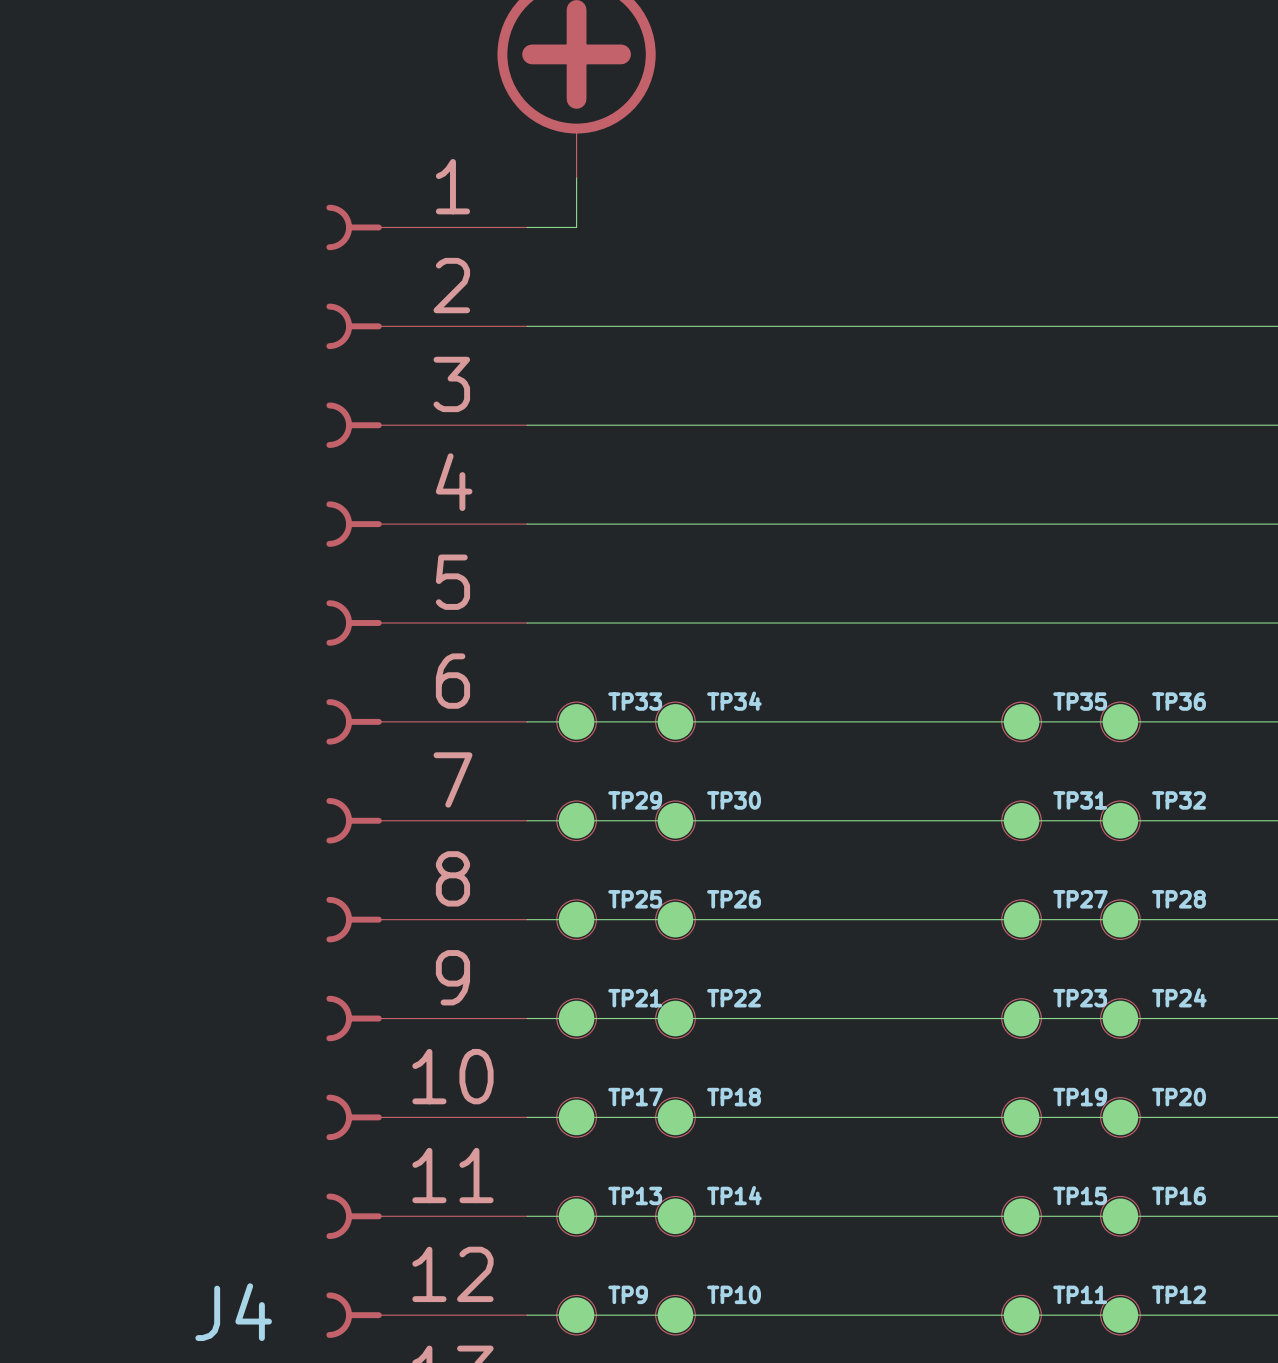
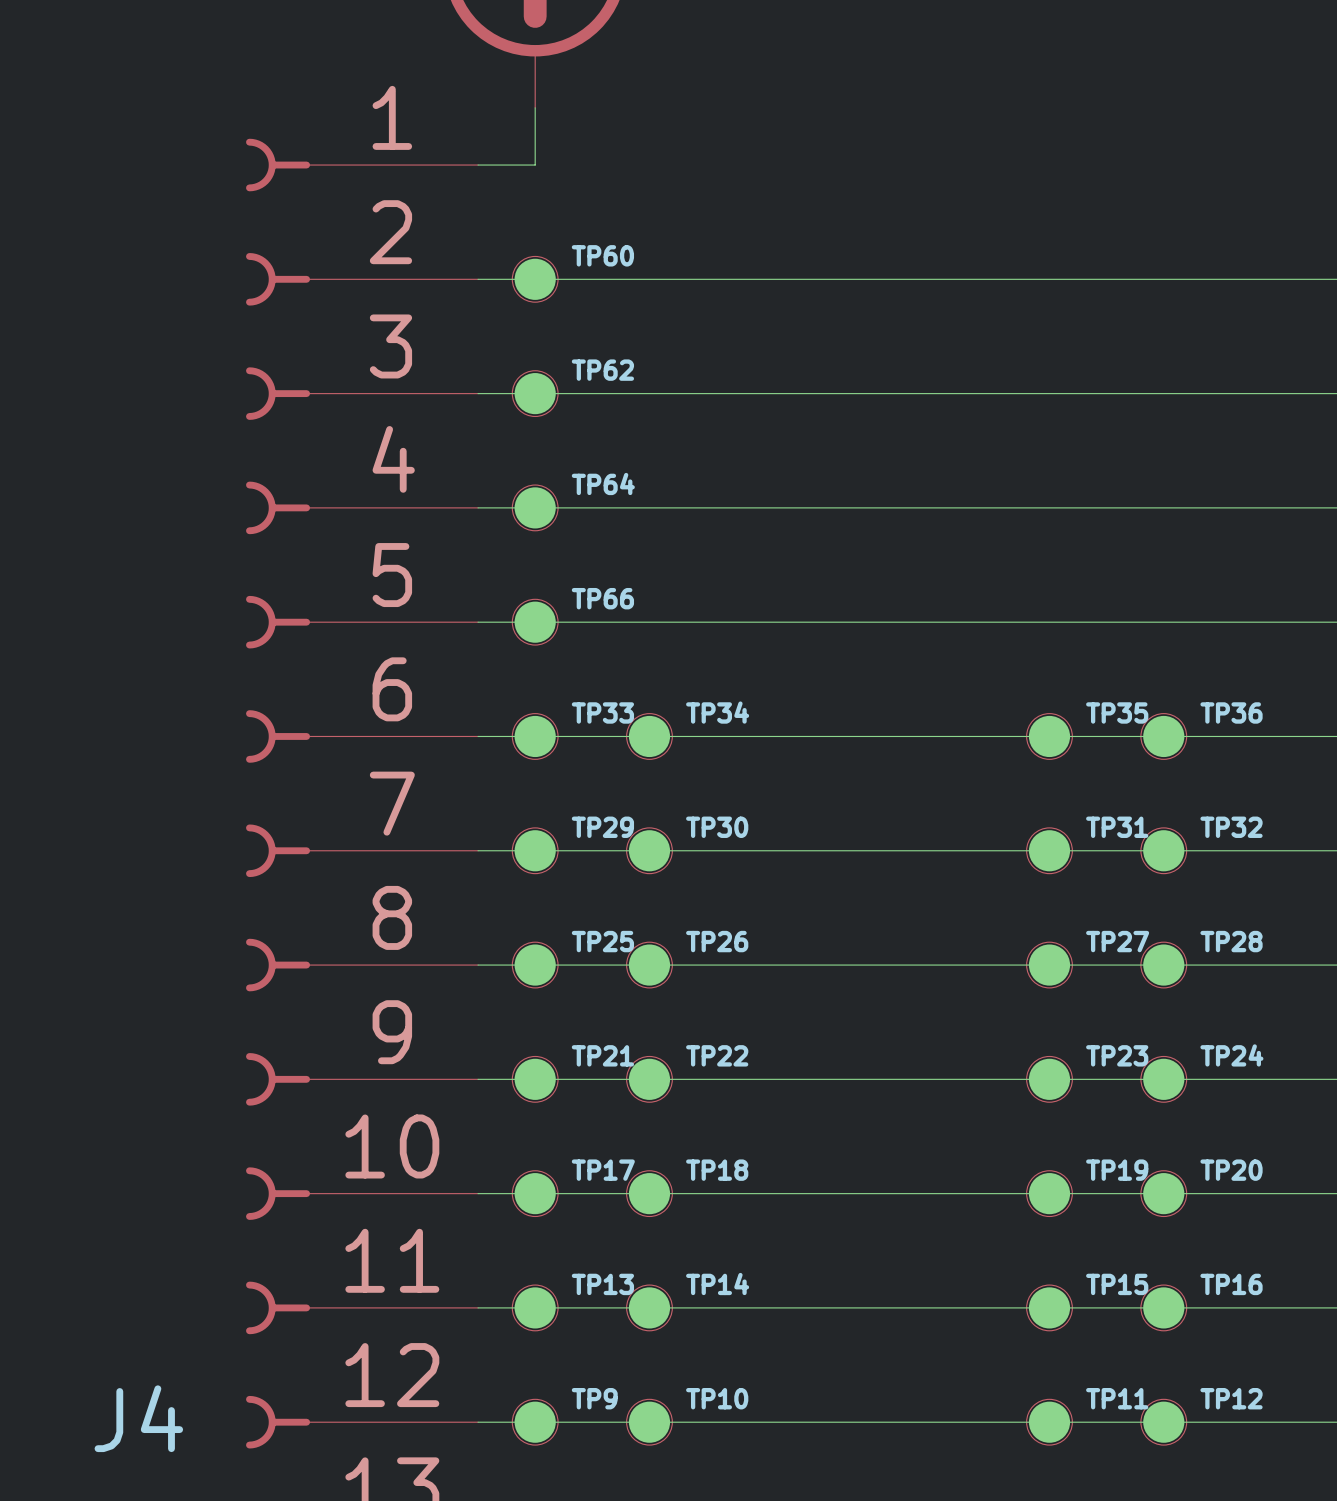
junction: none -> (535, 279)
TP60: none -> (535, 279)
junction: none -> (535, 393)
TP62: none -> (535, 393)
junction: none -> (535, 507)
TP64: none -> (535, 507)
junction: none -> (535, 622)
TP66: none -> (535, 622)

